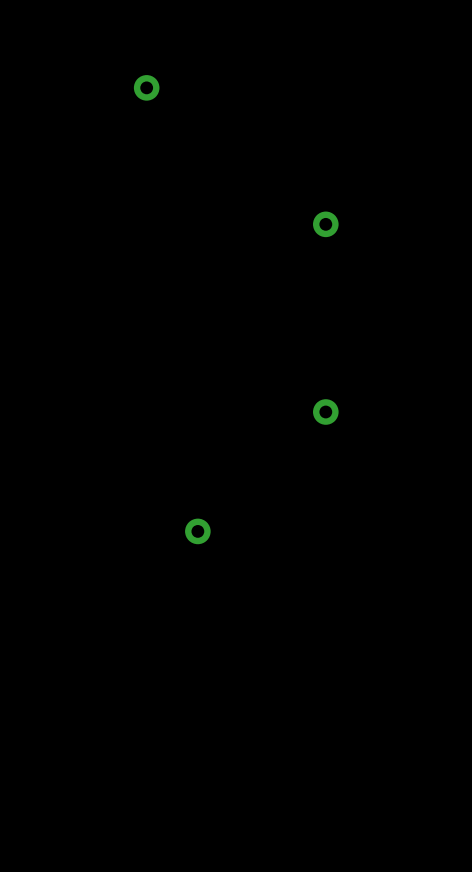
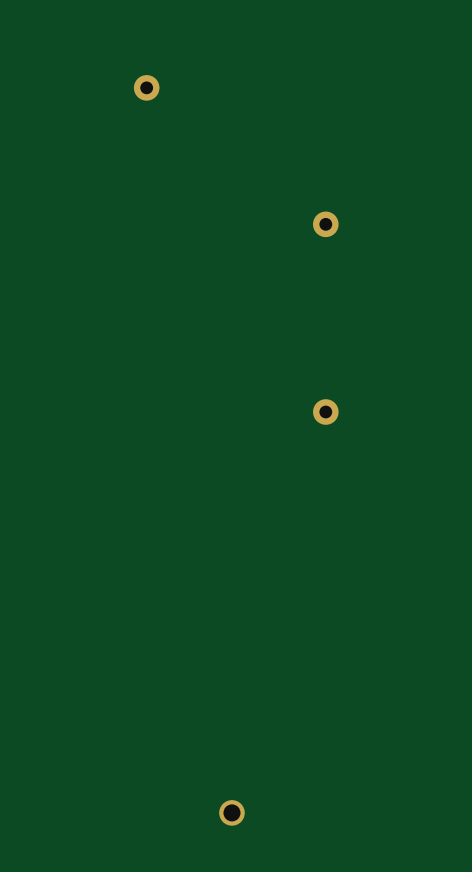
via: (197, 531) -> none
via: none -> (231, 812)

